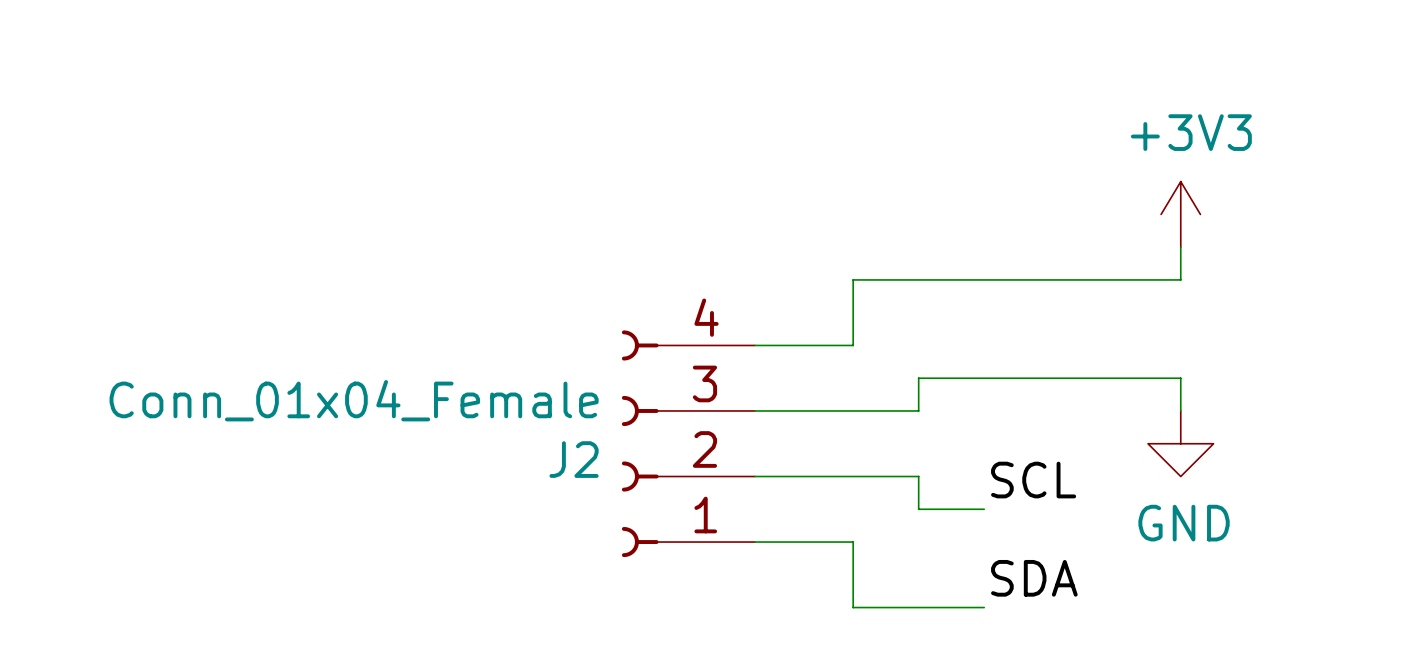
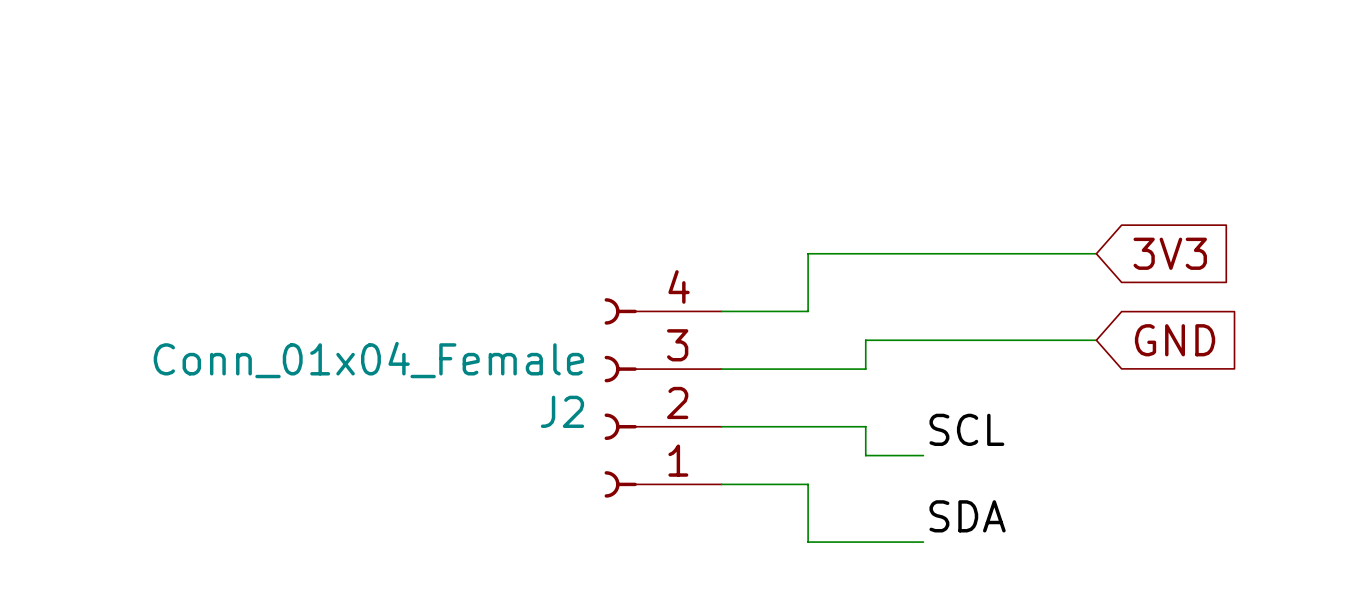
power symbol: +3V3 (1180, 214) -> none
wire: (1180, 247) (1180, 279) -> none
global label: none -> 3V3 (1170, 253)
wire: (1180, 378) (1180, 410) -> none
global label: none -> GND (1175, 340)
power symbol: GND (1180, 443) -> none

